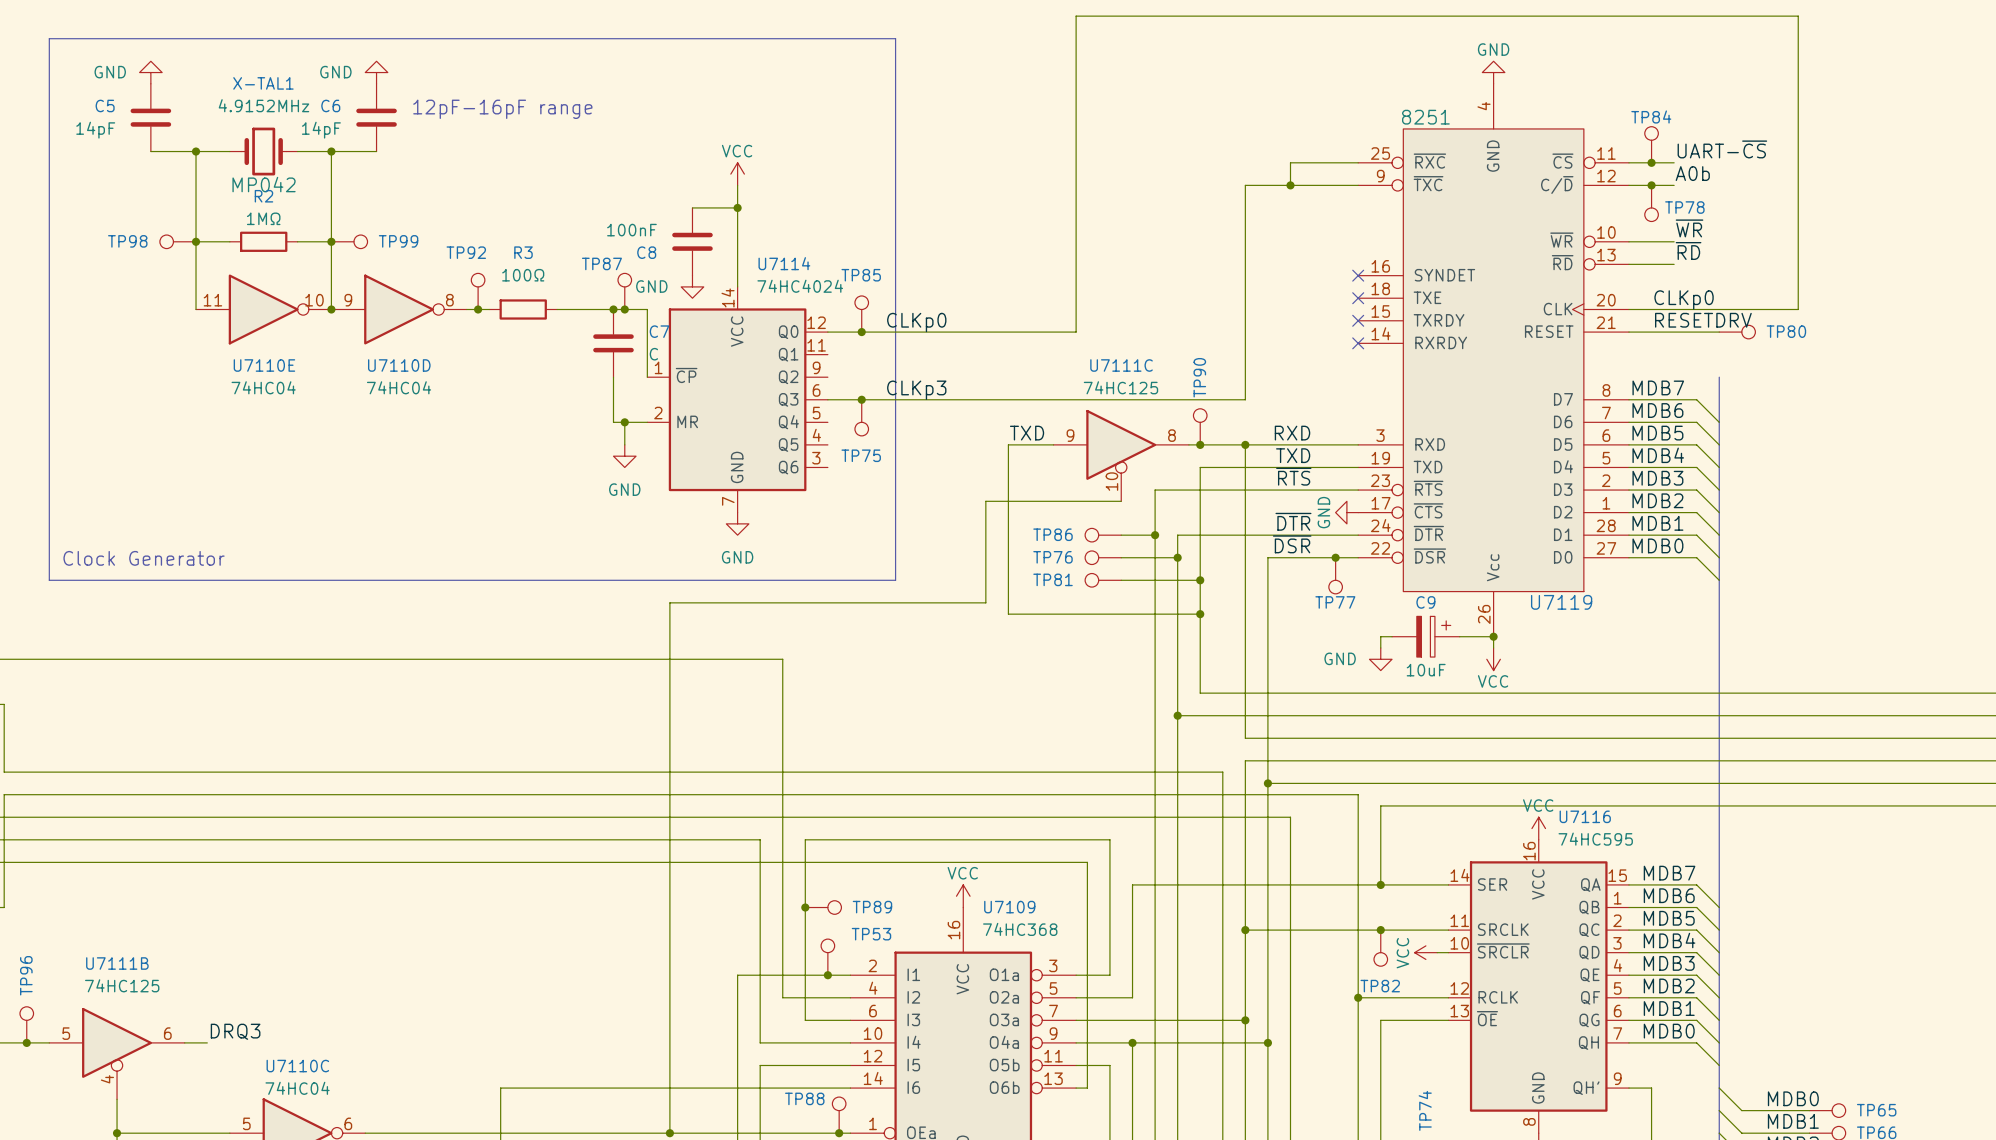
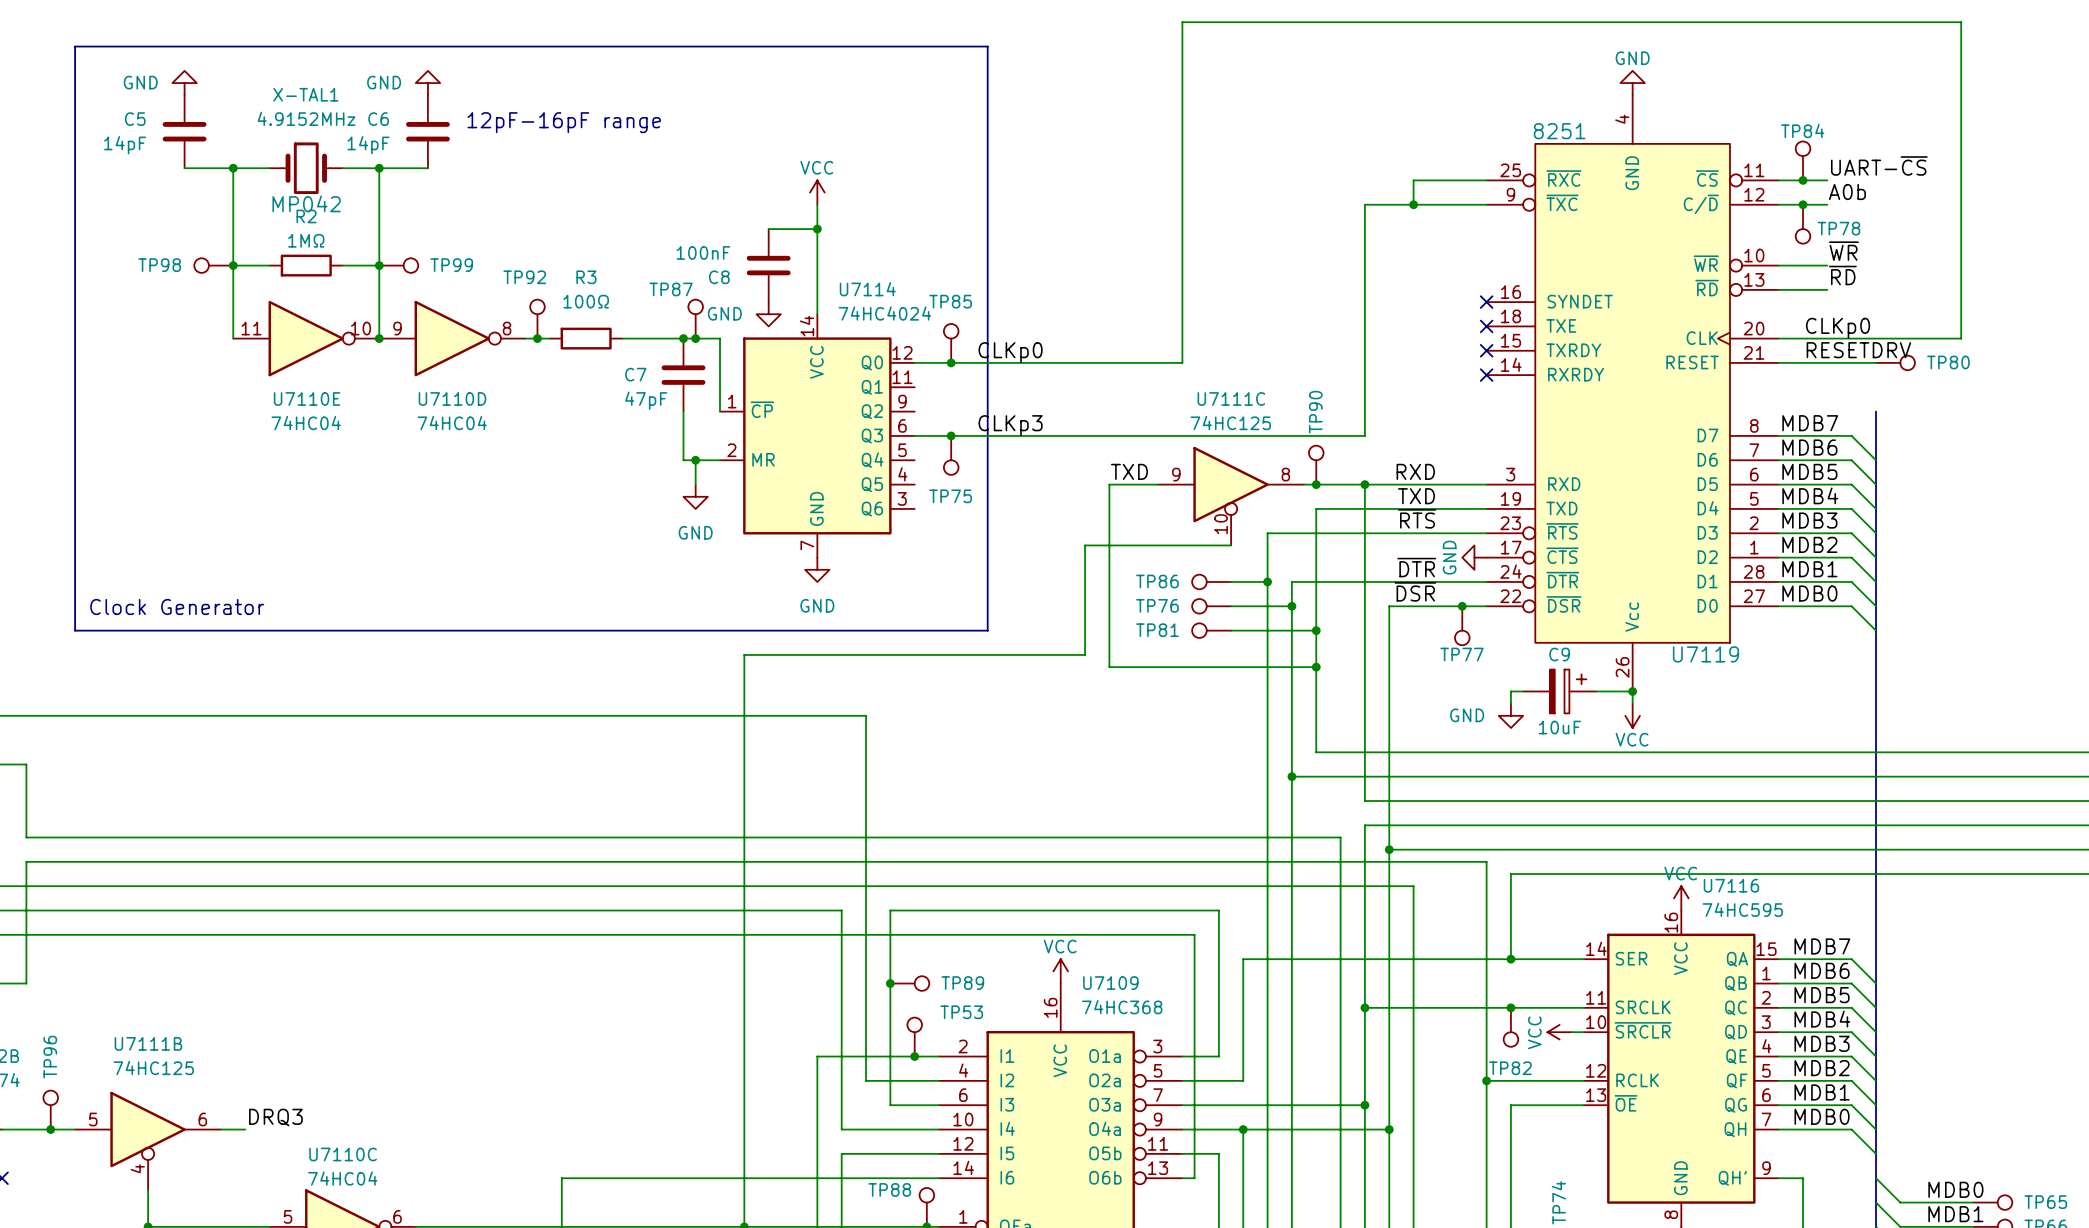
C7 name position: C7 (659, 331) -> C7 (635, 374)
C7 value: C (653, 354) -> 47pF (646, 400)

